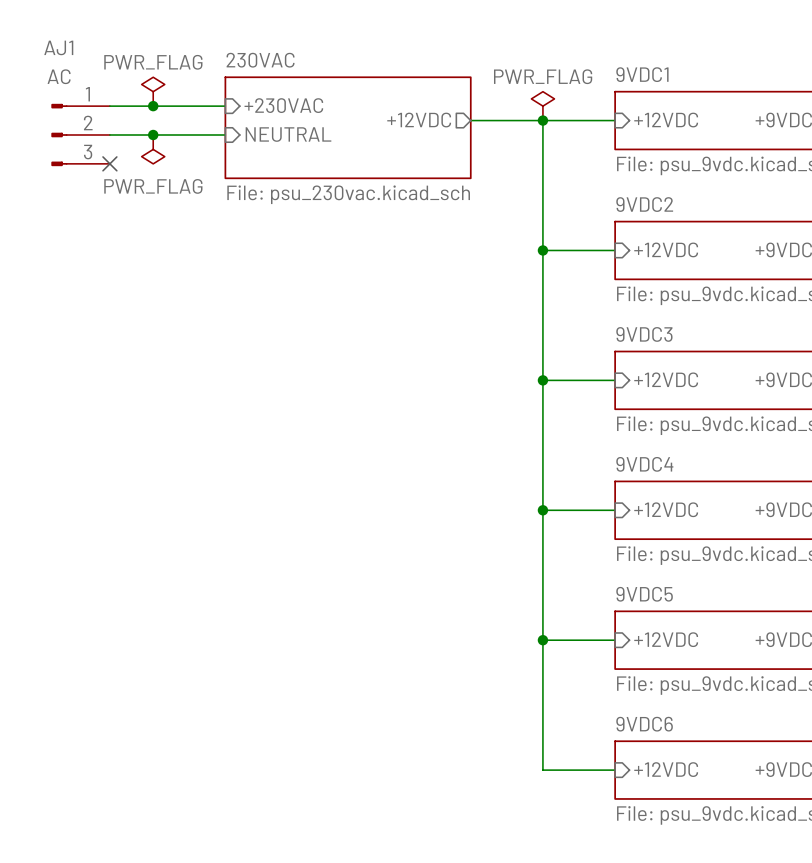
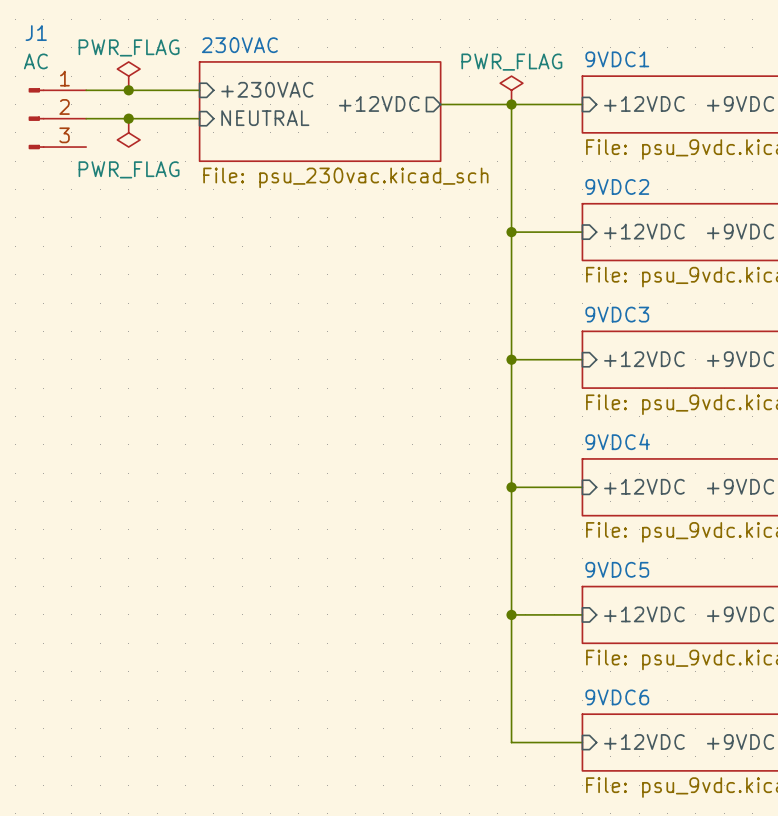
AJ1 name: AJ1 (58, 47) -> J1 (36, 33)
no-connect mark: (109, 163) -> none

